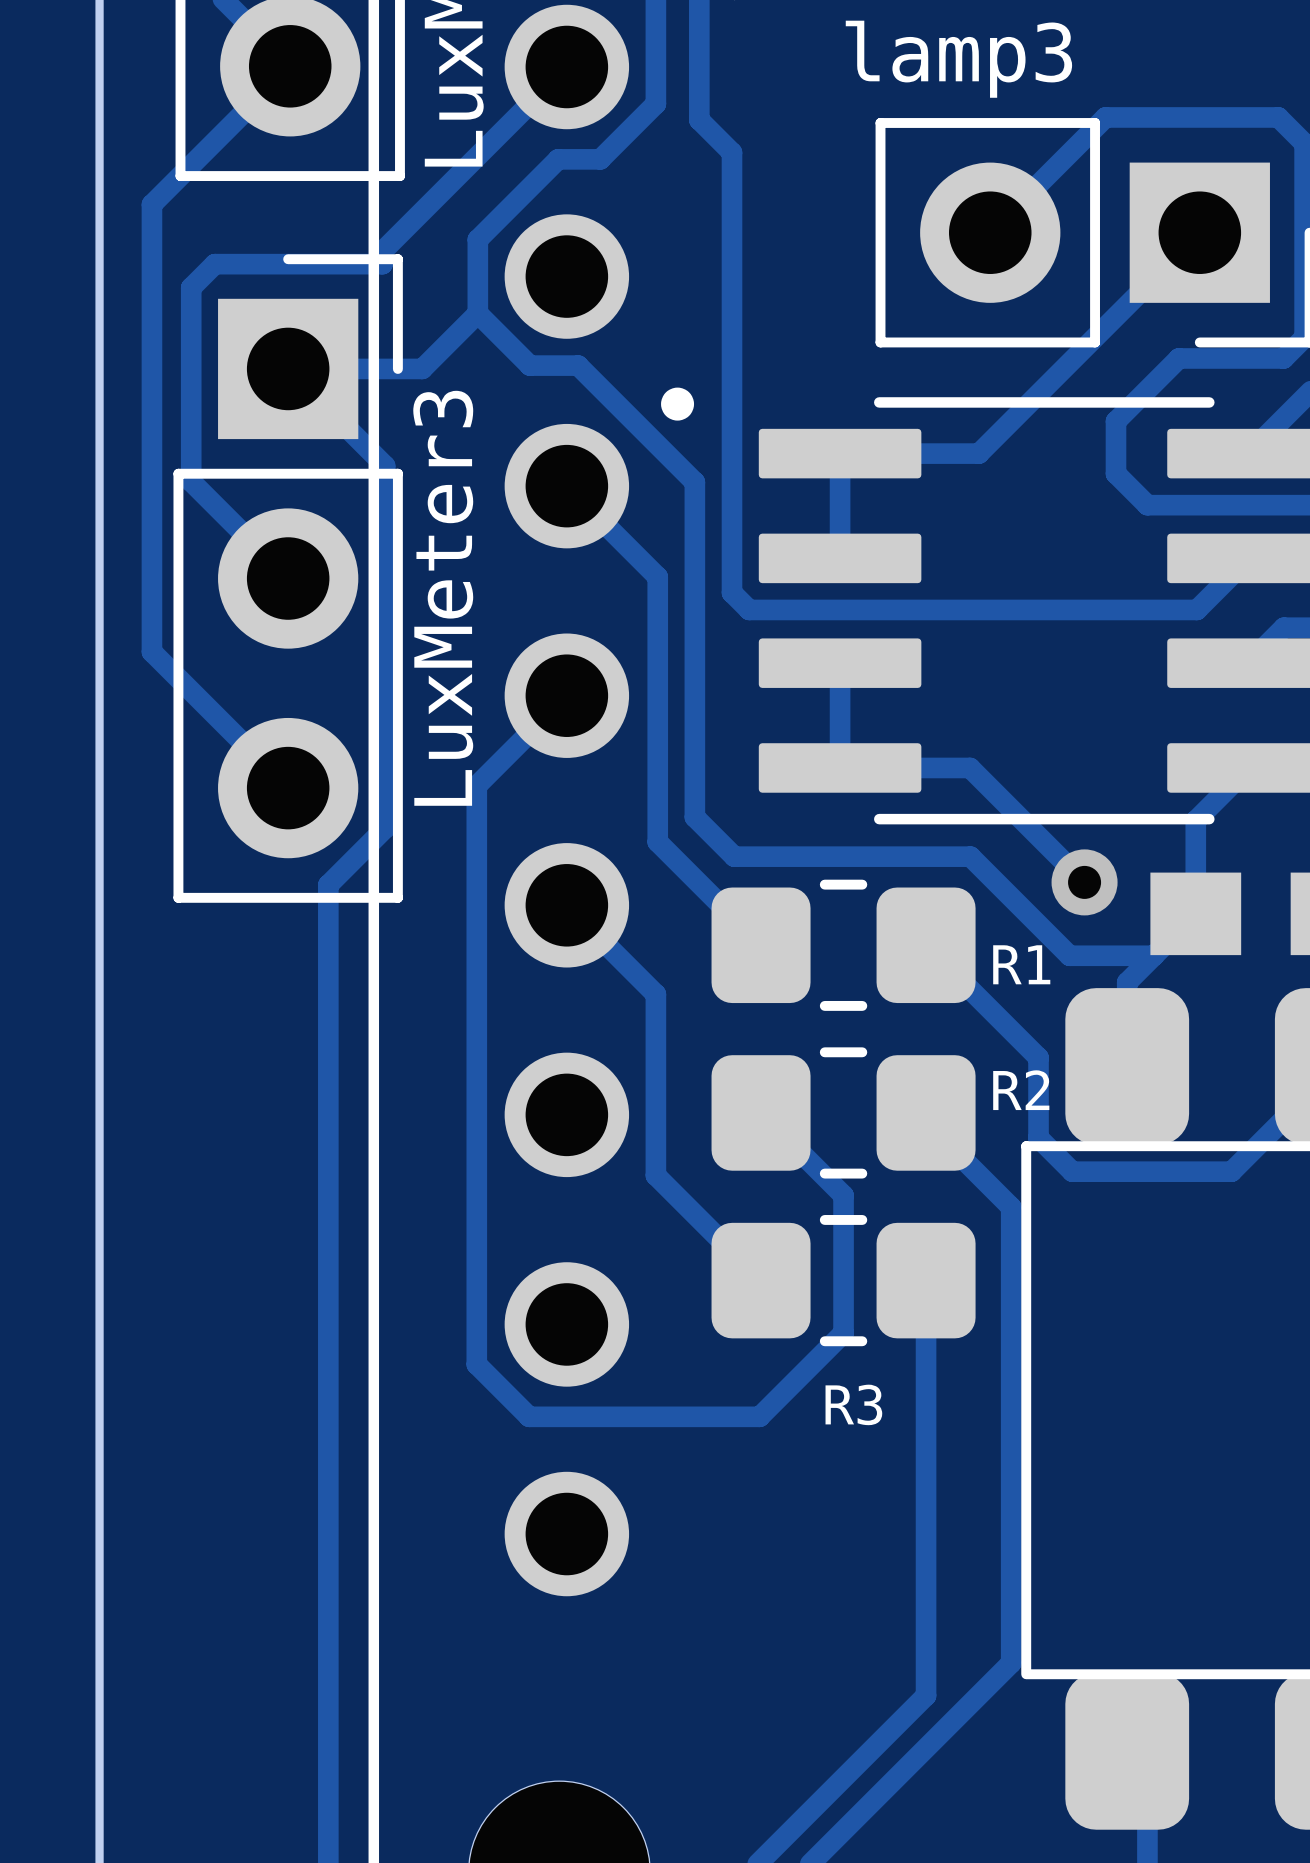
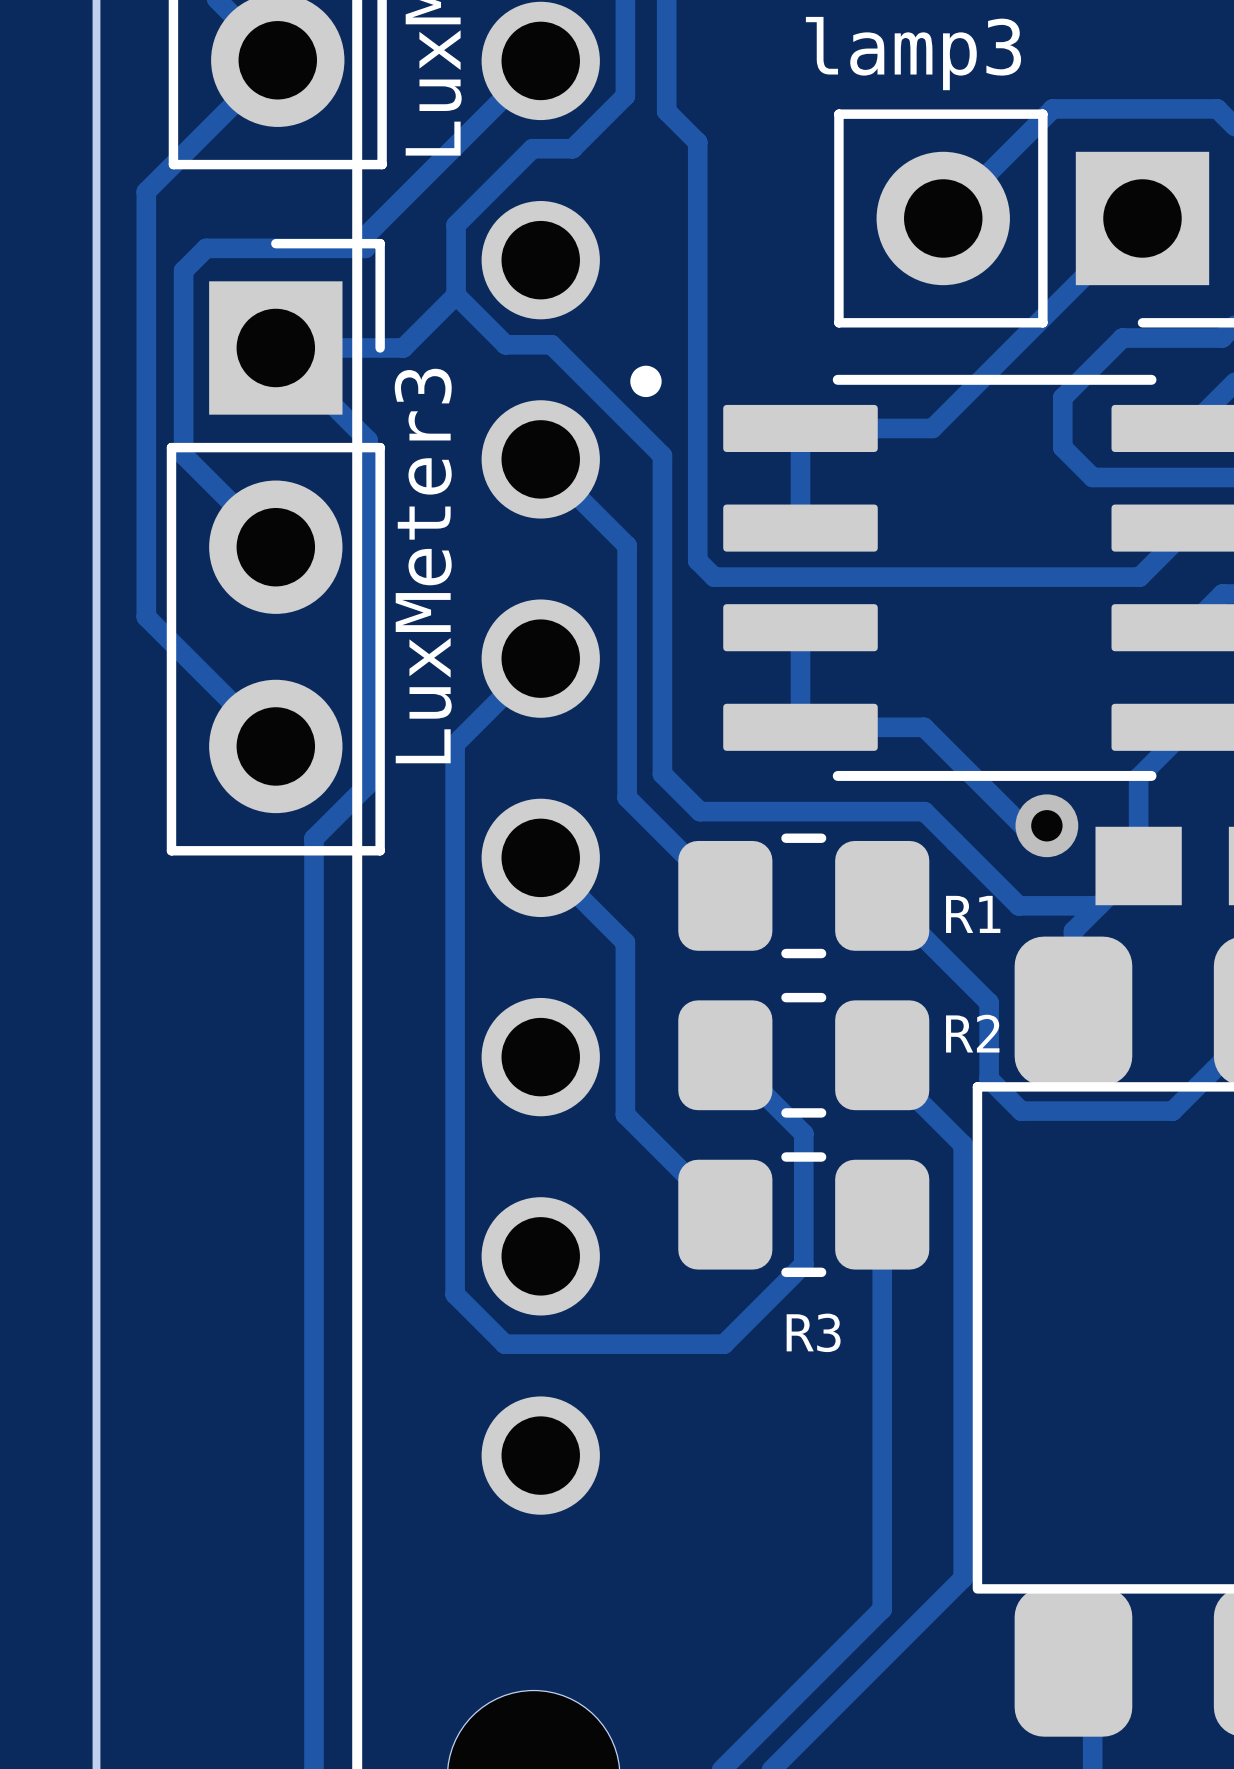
via position: (1084, 882) -> (1046, 825)

